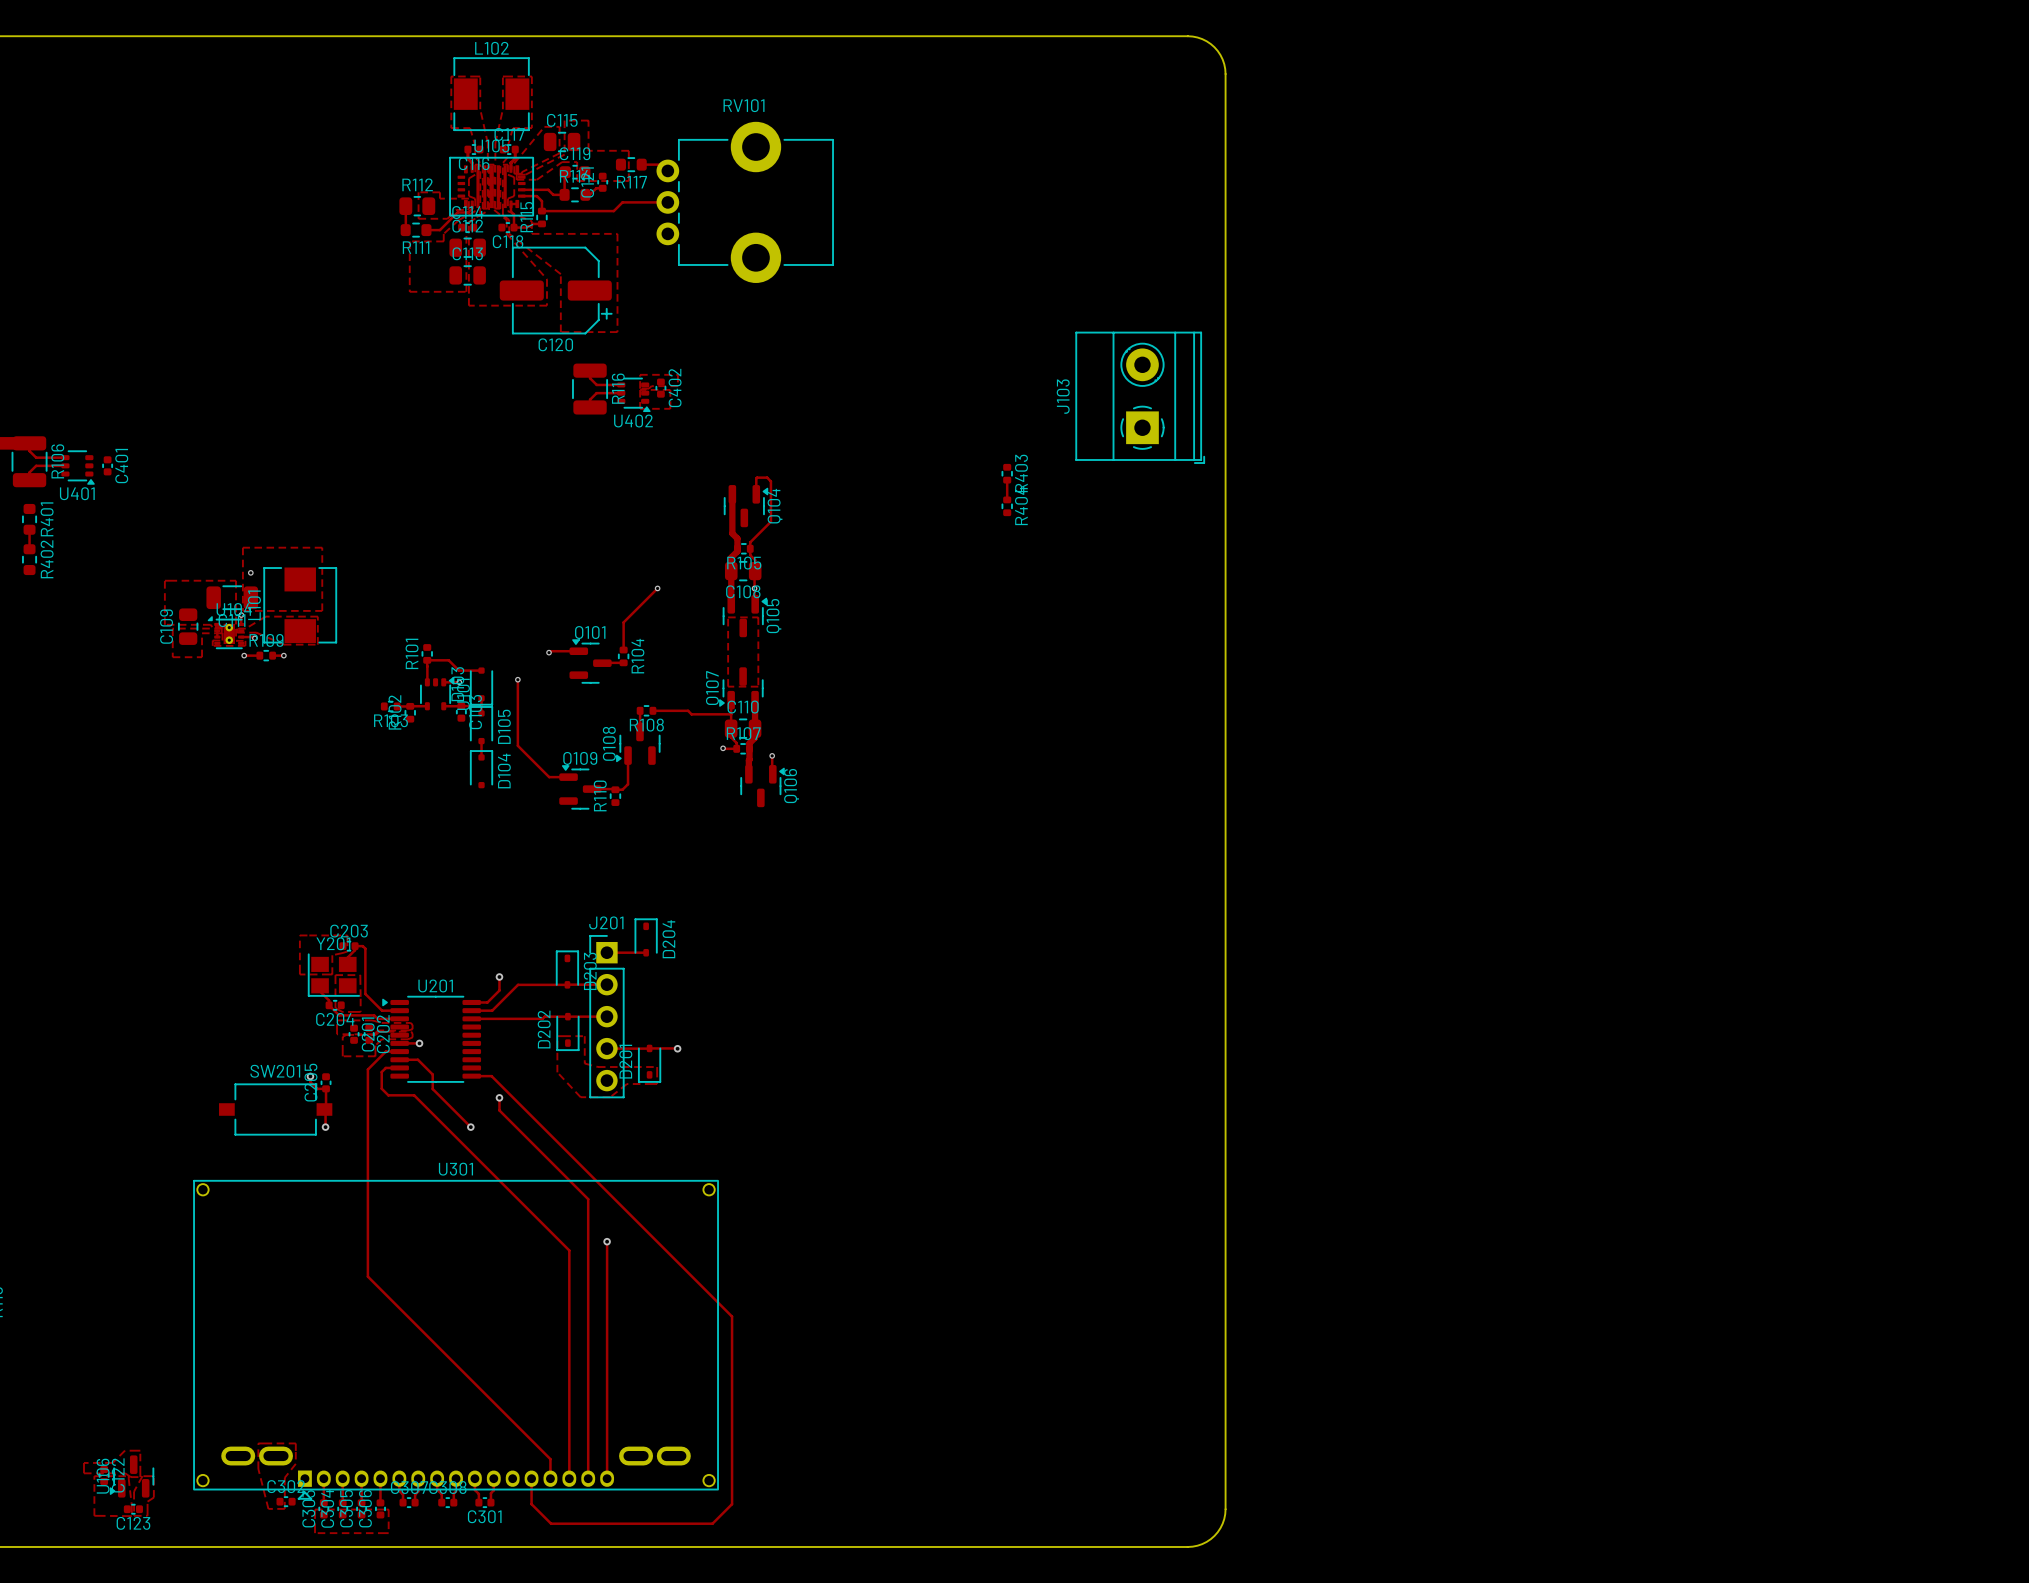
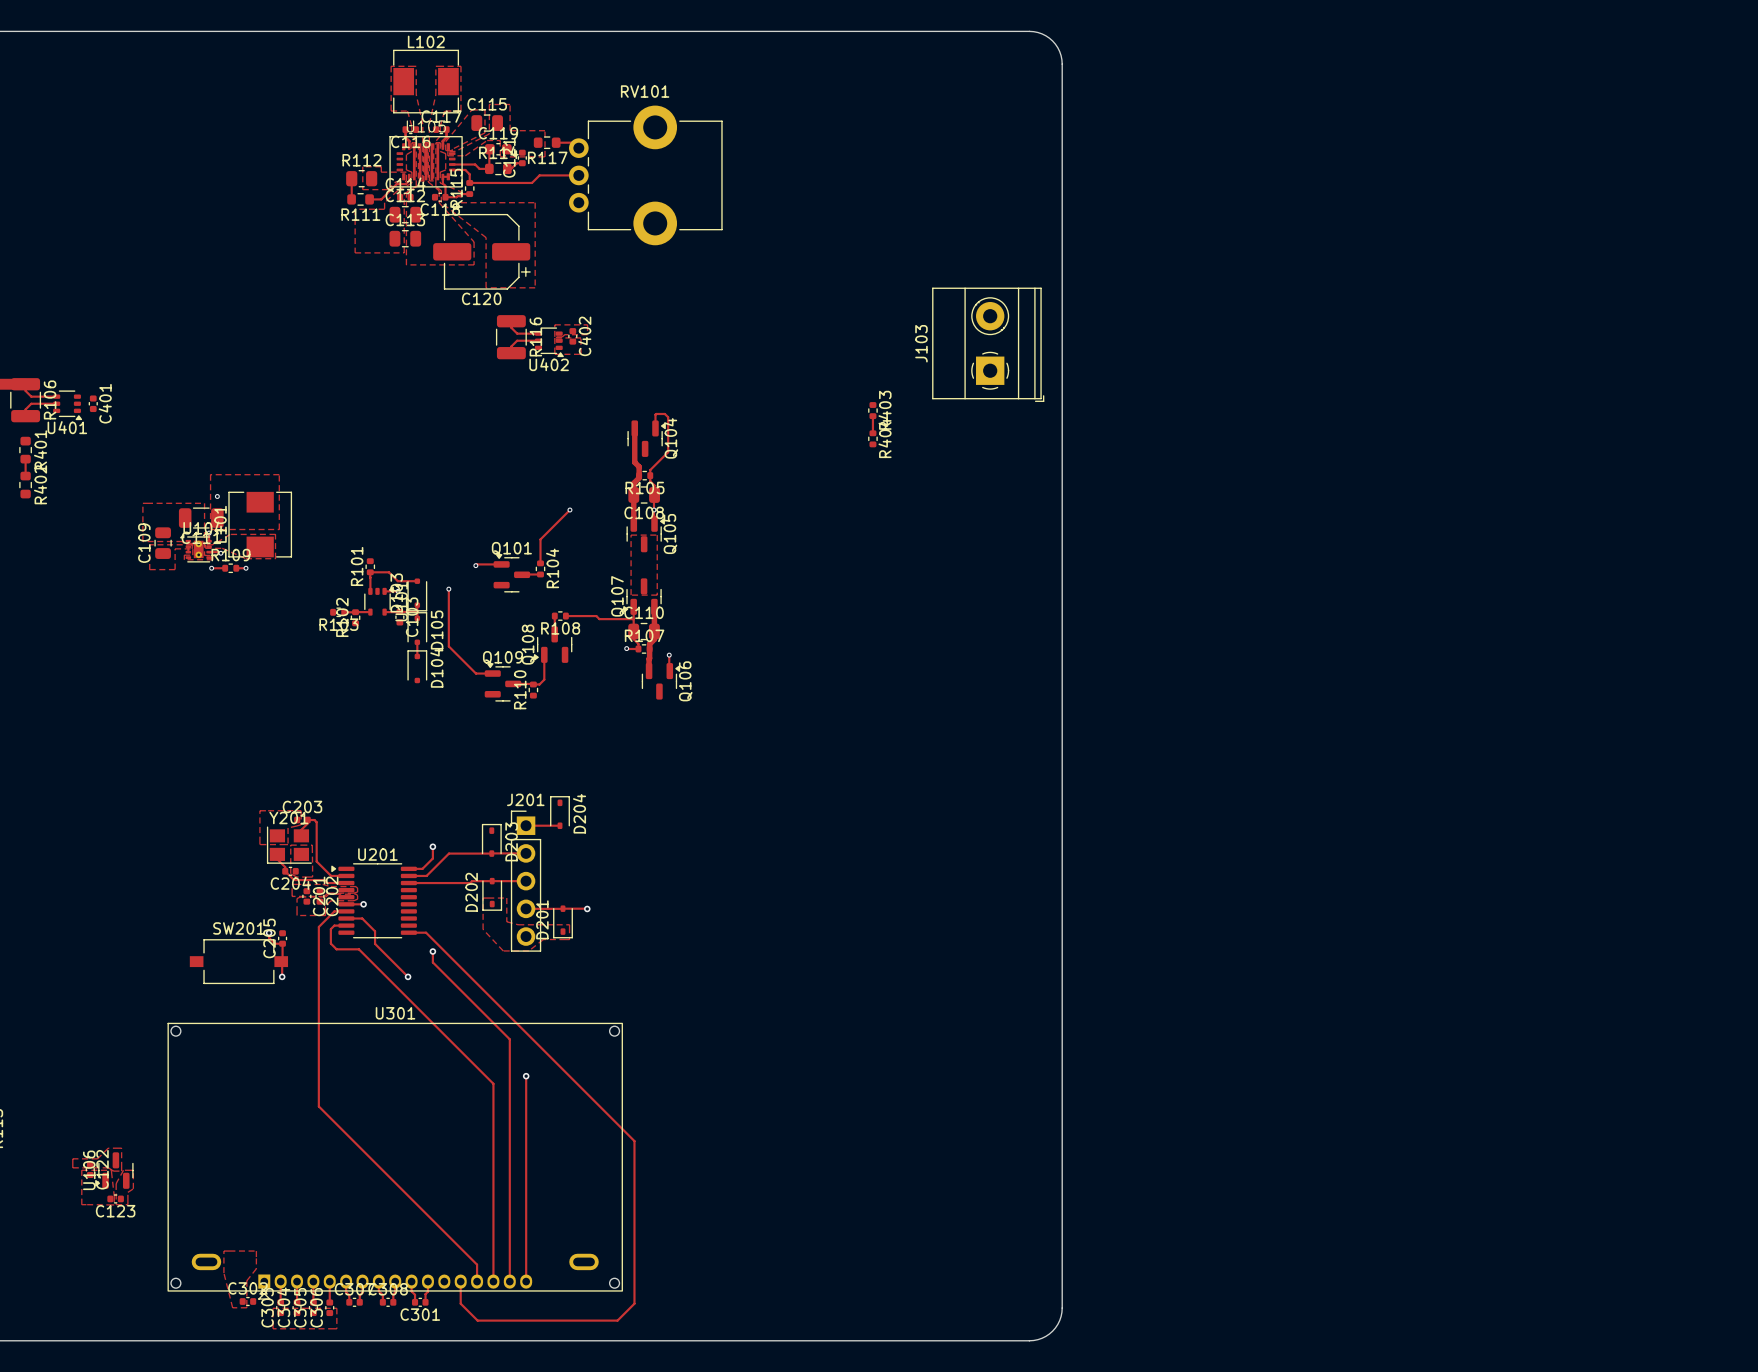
U301 footprint: [193, 1180, 719, 1500] -> [167, 1022, 623, 1300]
zone outline: (124, 1450) (140, 1450) (140, 1477) (130, 1477) (125, 1473) (83, 1473) (83, 1462) (112, 1462) (124, 1450) -> (108, 1148) (121, 1148) (121, 1171) (113, 1171) (108, 1167) (72, 1167) (72, 1158) (97, 1158) (108, 1148)
C122 position: (104, 1475) -> (90, 1169)
zone outline: (94, 1476) (128, 1476) (131, 1516) (94, 1515) (94, 1476) -> (81, 1170) (111, 1170) (114, 1204) (81, 1204) (81, 1170)
U106 position: (131, 1476) -> (114, 1170)
zone outline: (142, 1476) (153, 1476) (153, 1497) (147, 1501) (147, 1515) (134, 1515) (134, 1491) (142, 1476) -> (123, 1170) (133, 1170) (133, 1188) (127, 1192) (127, 1204) (116, 1204) (116, 1183) (123, 1170)
C123 position: (133, 1509) -> (115, 1198)

